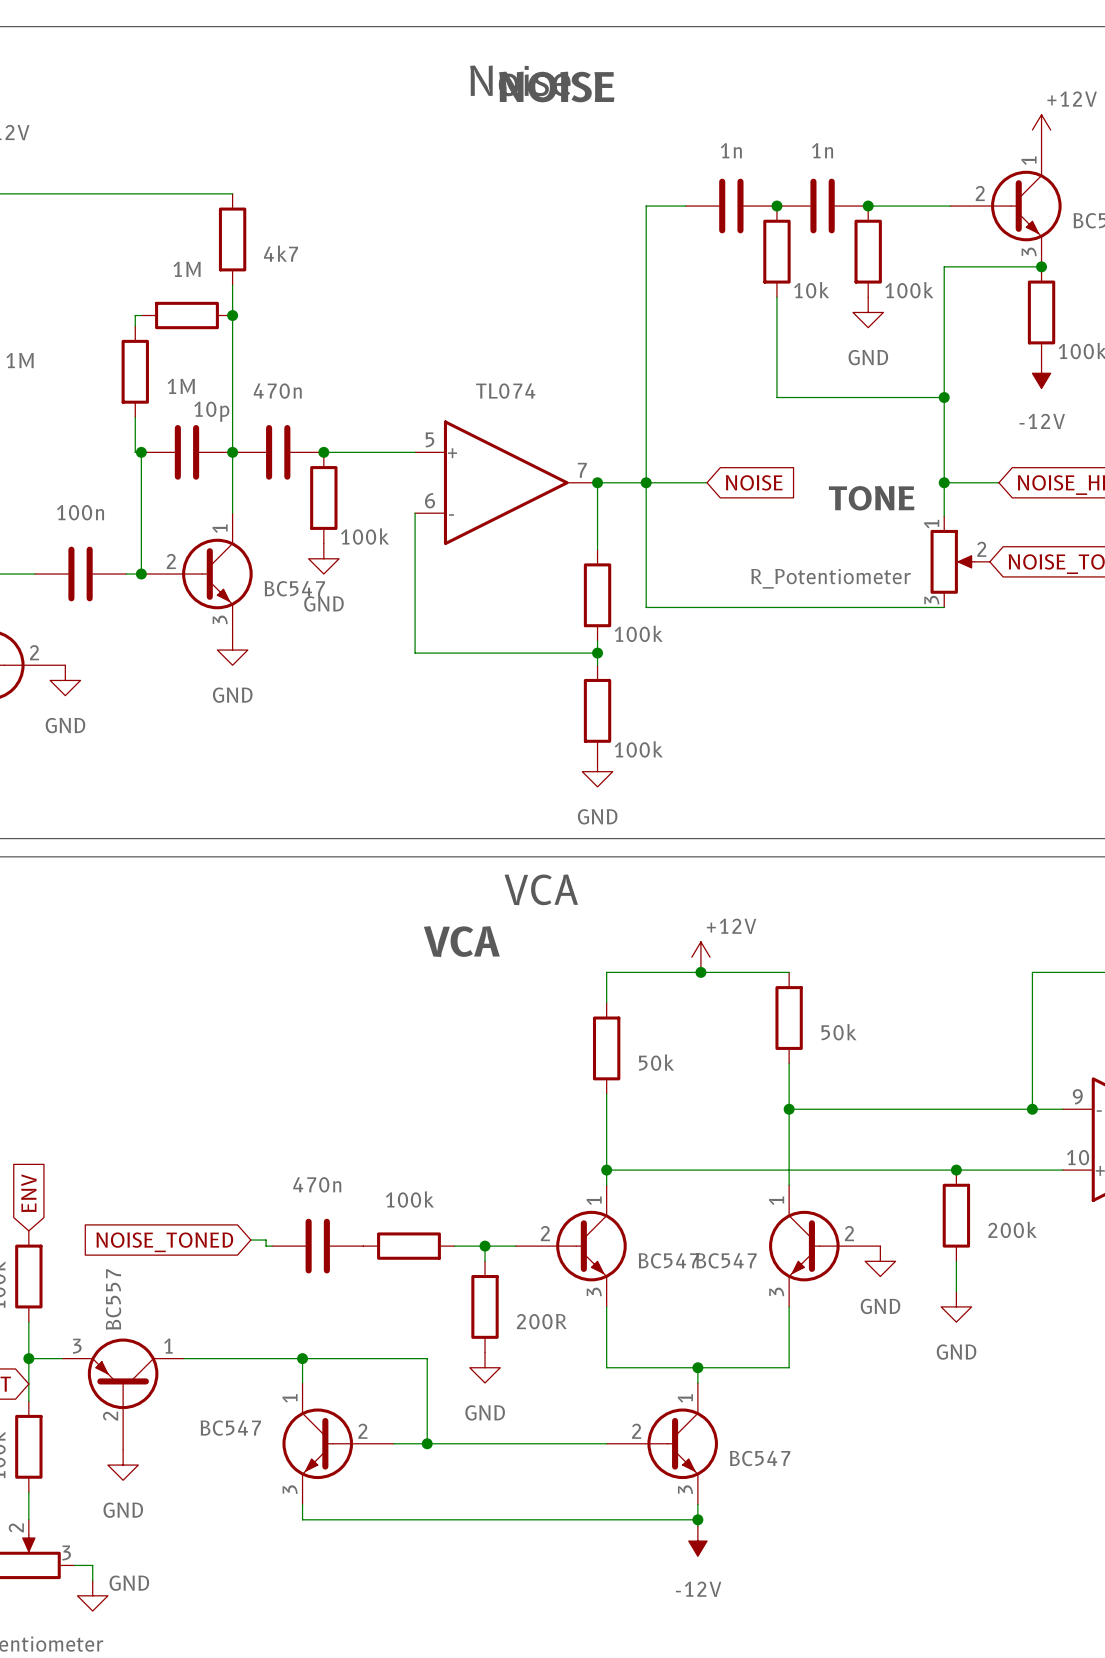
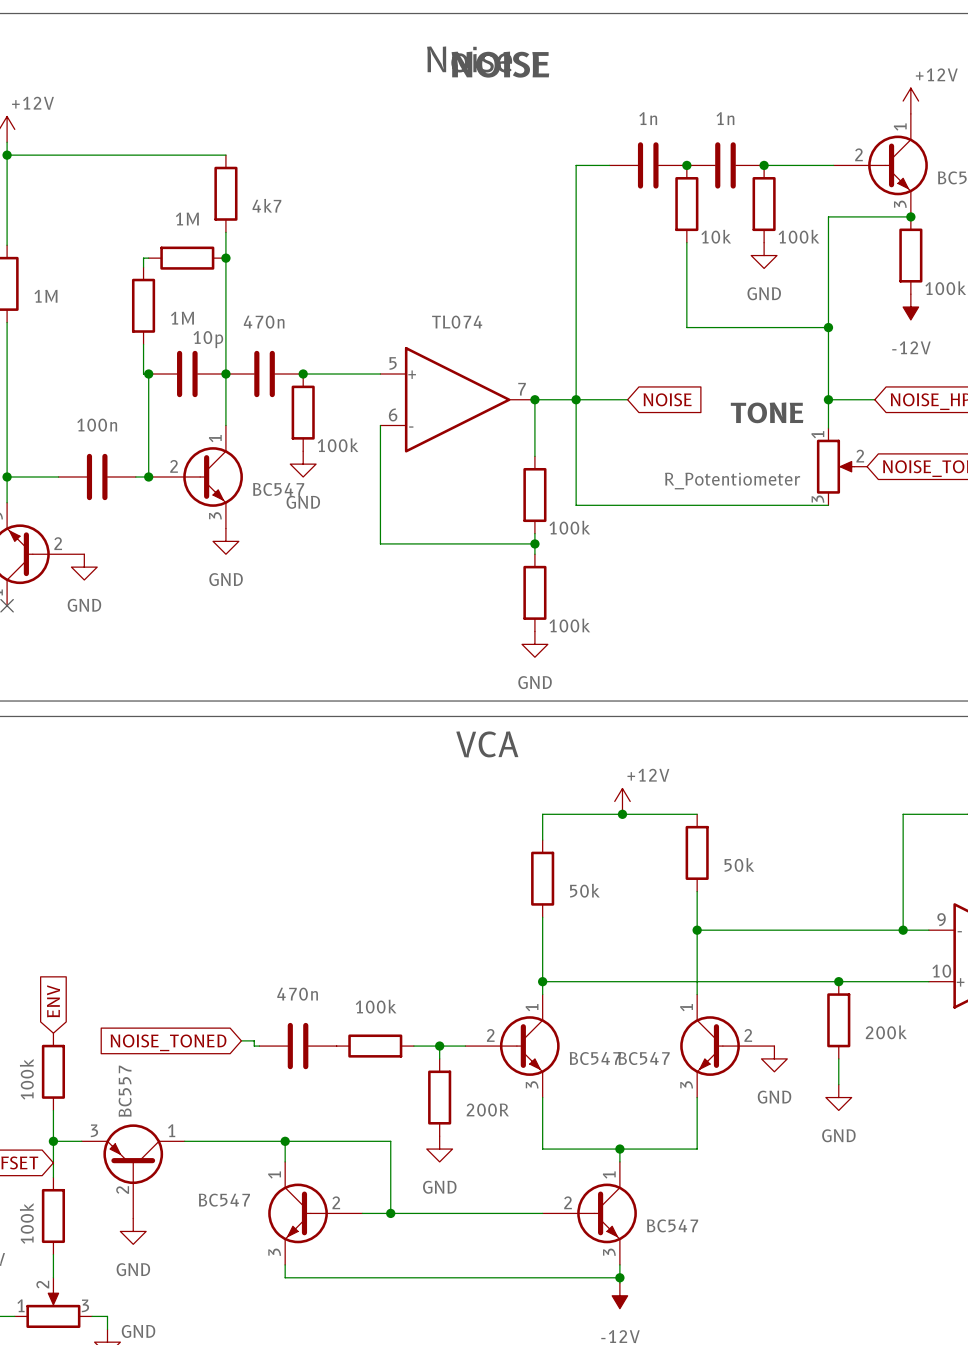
text: VCA (461, 941) -> none

